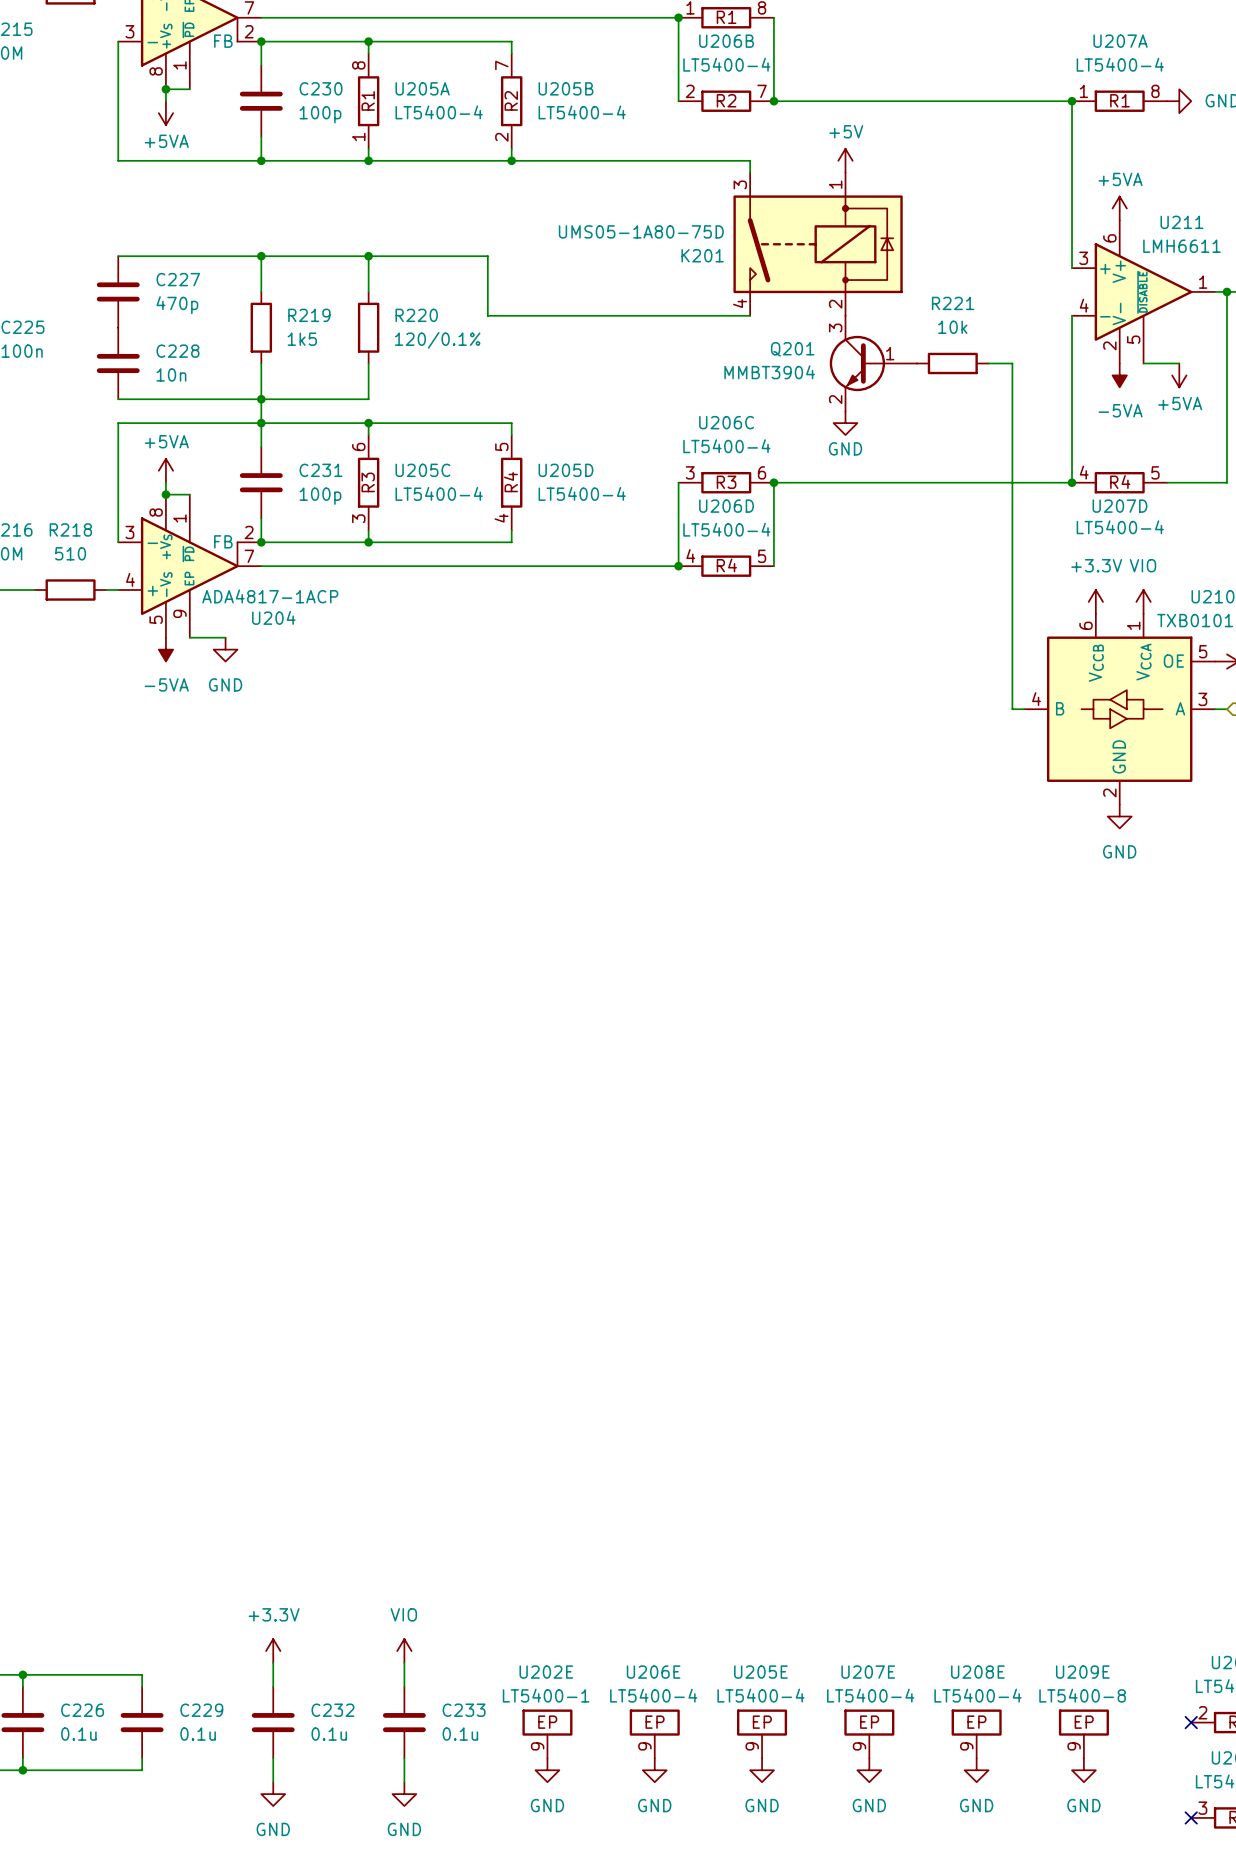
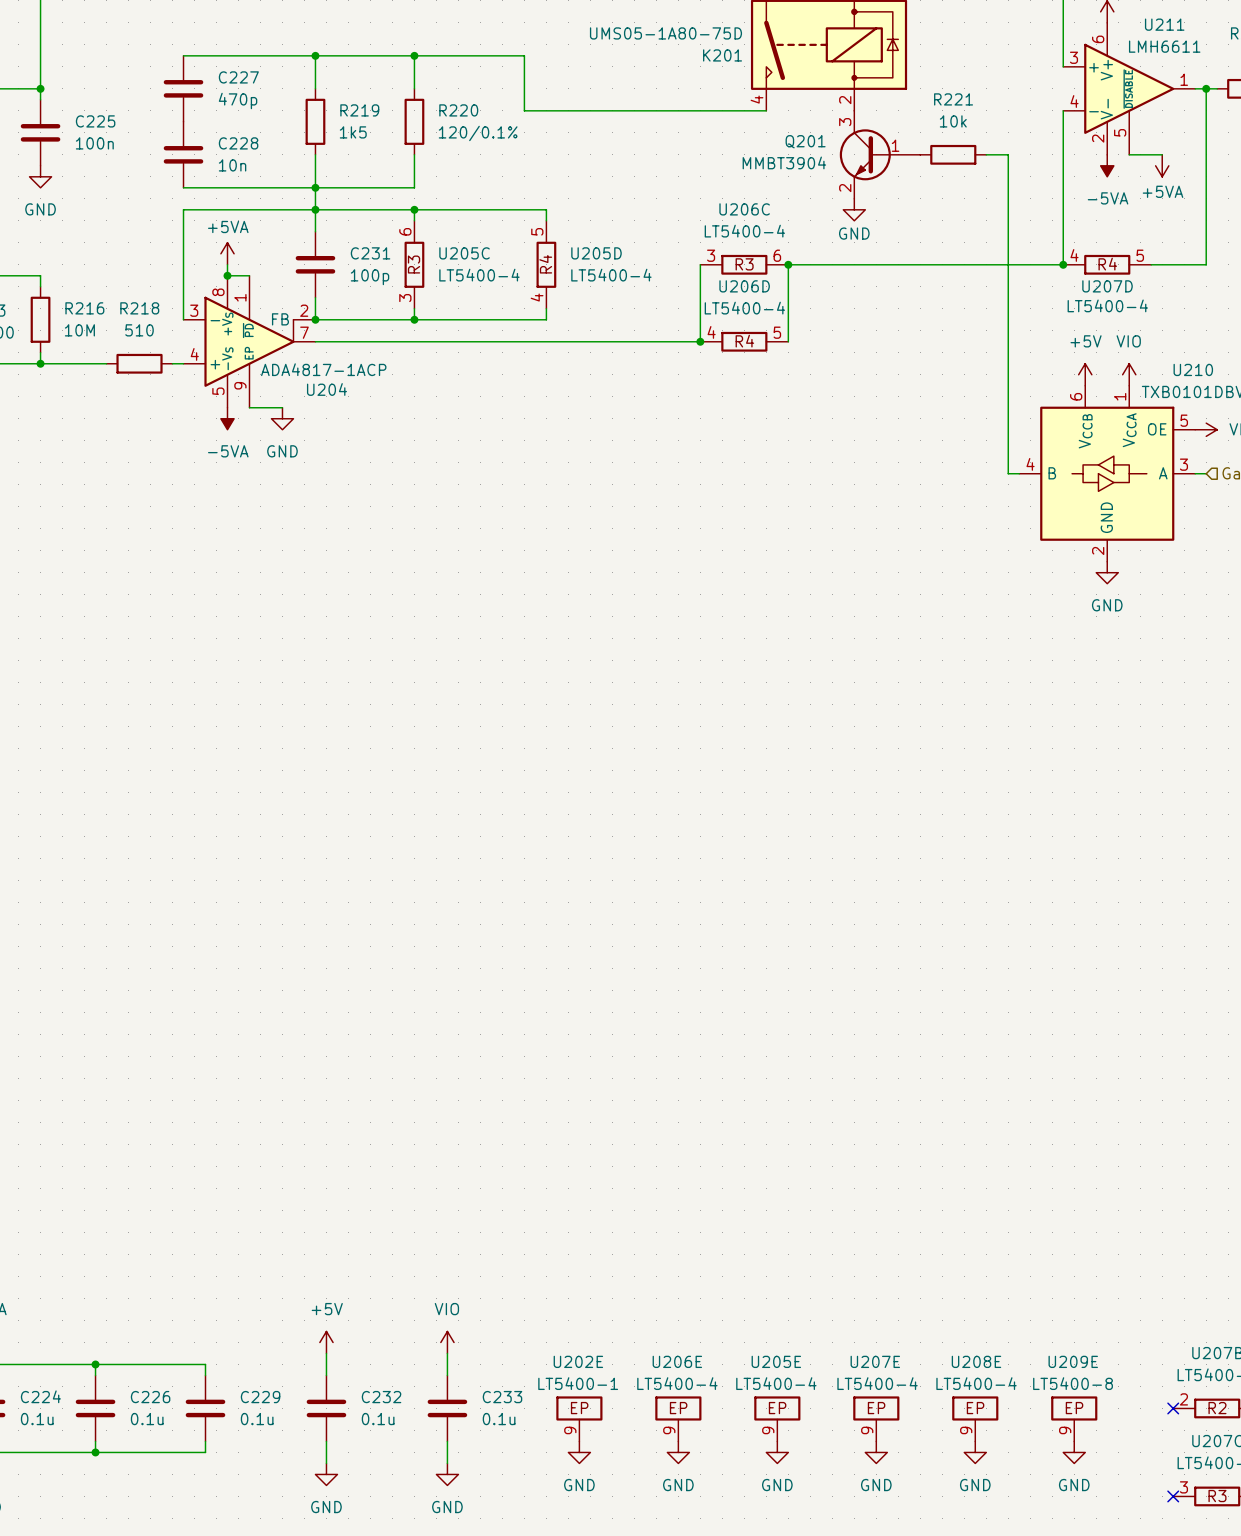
power symbol: +3.3V (1095, 601) -> +5V (1085, 374)
power symbol: +3.3V (273, 1651) -> +5V (326, 1342)

